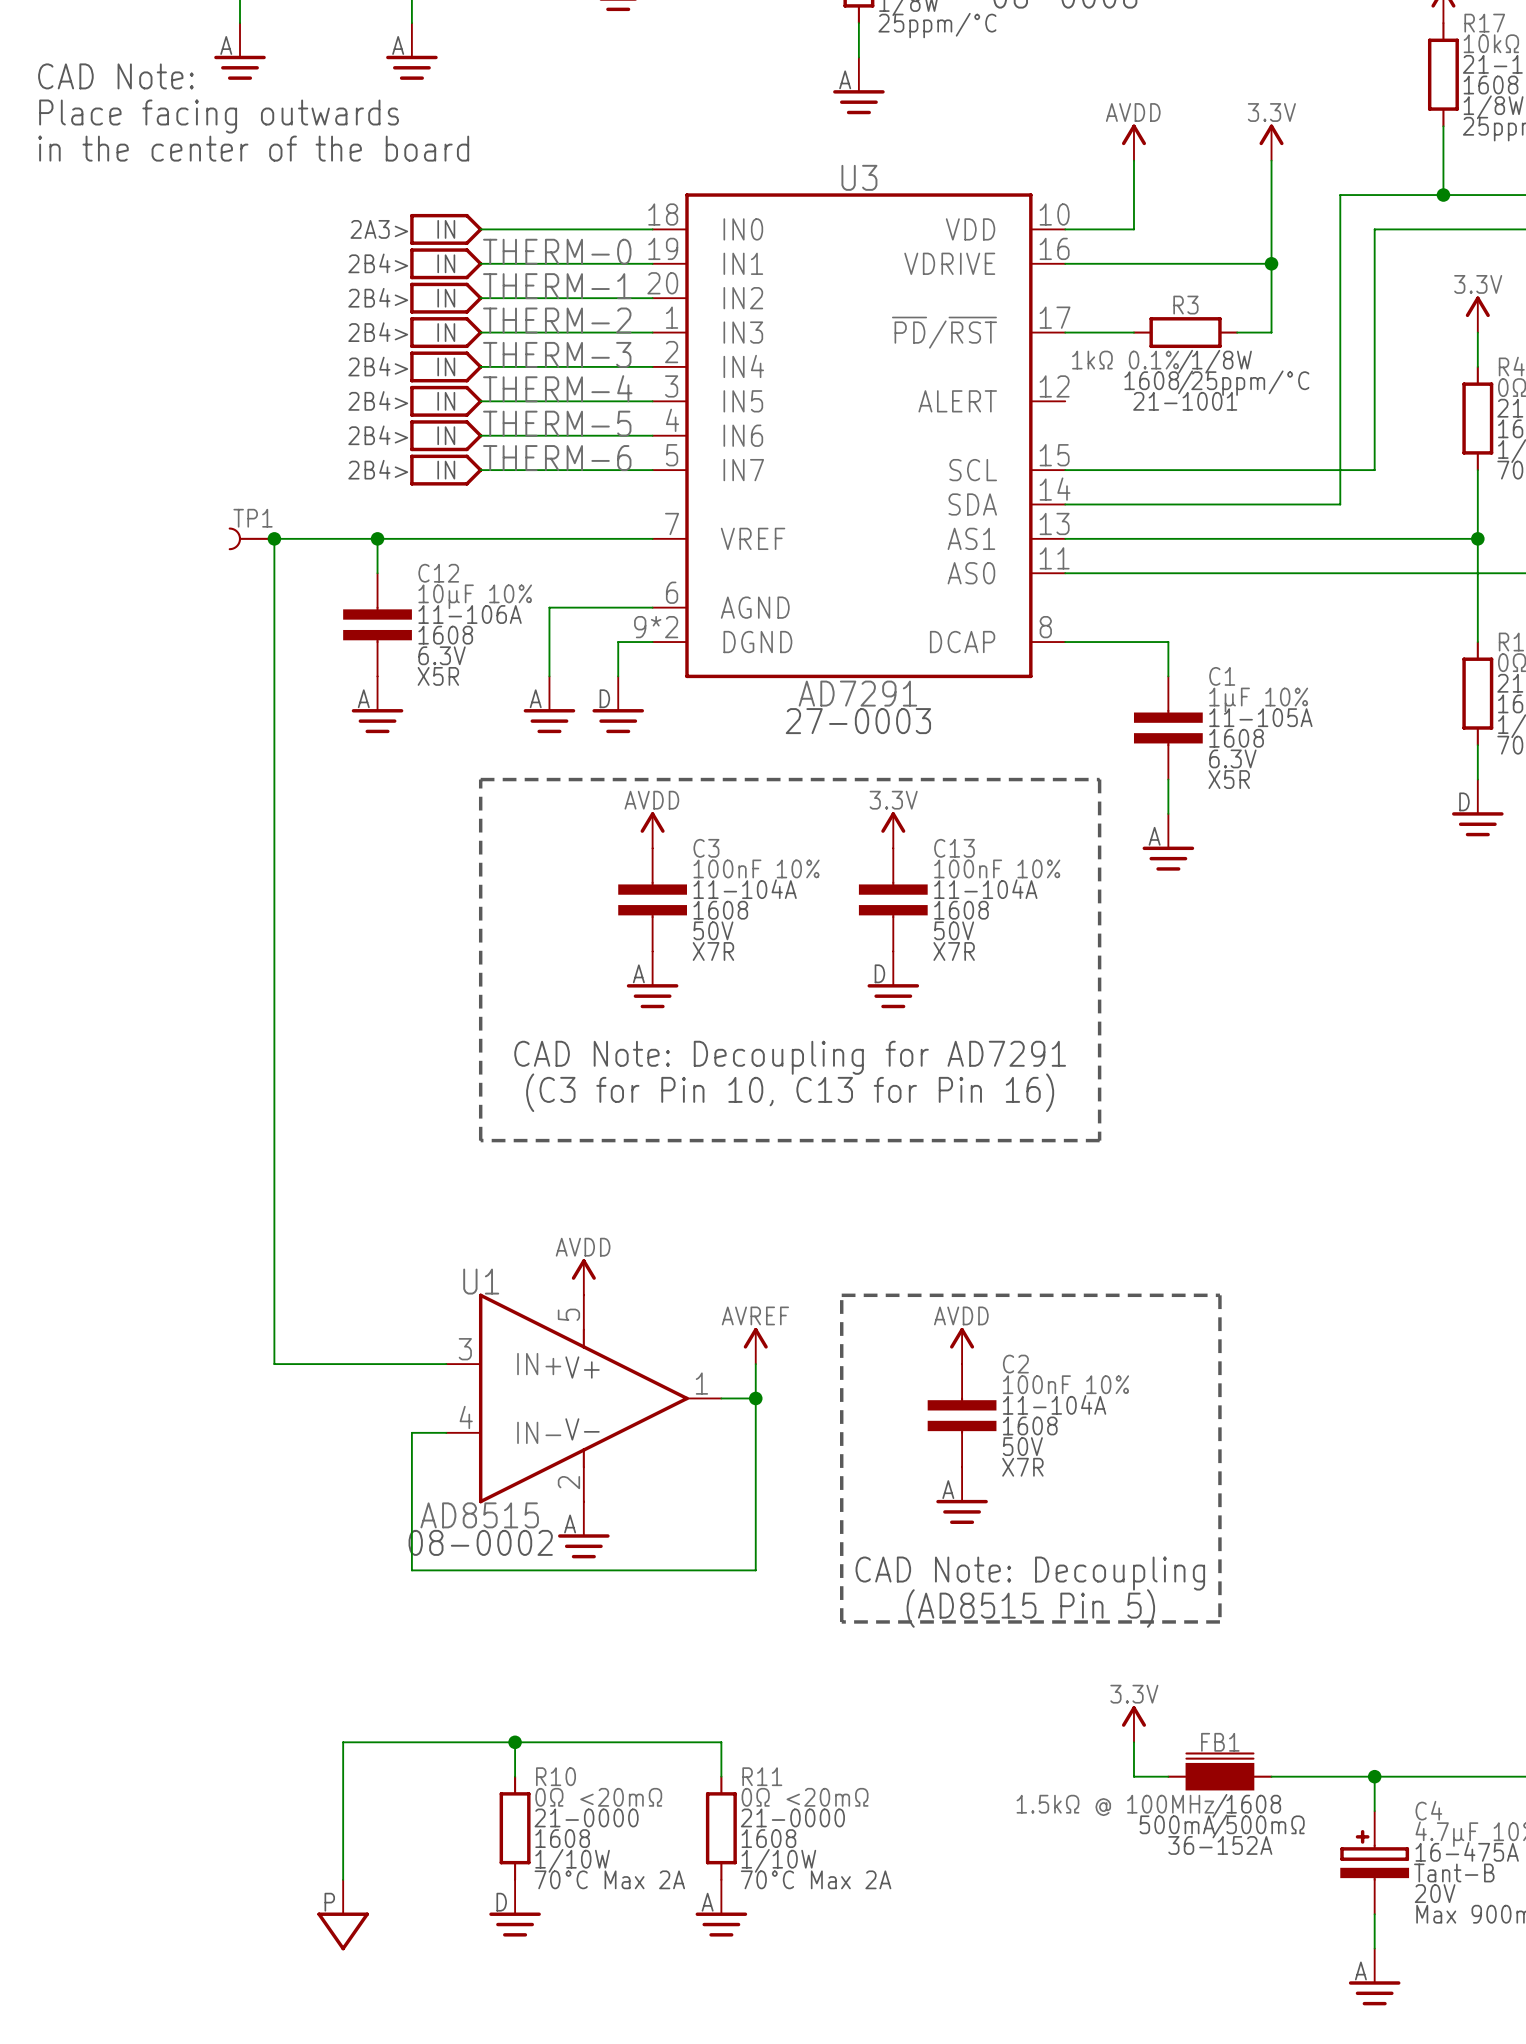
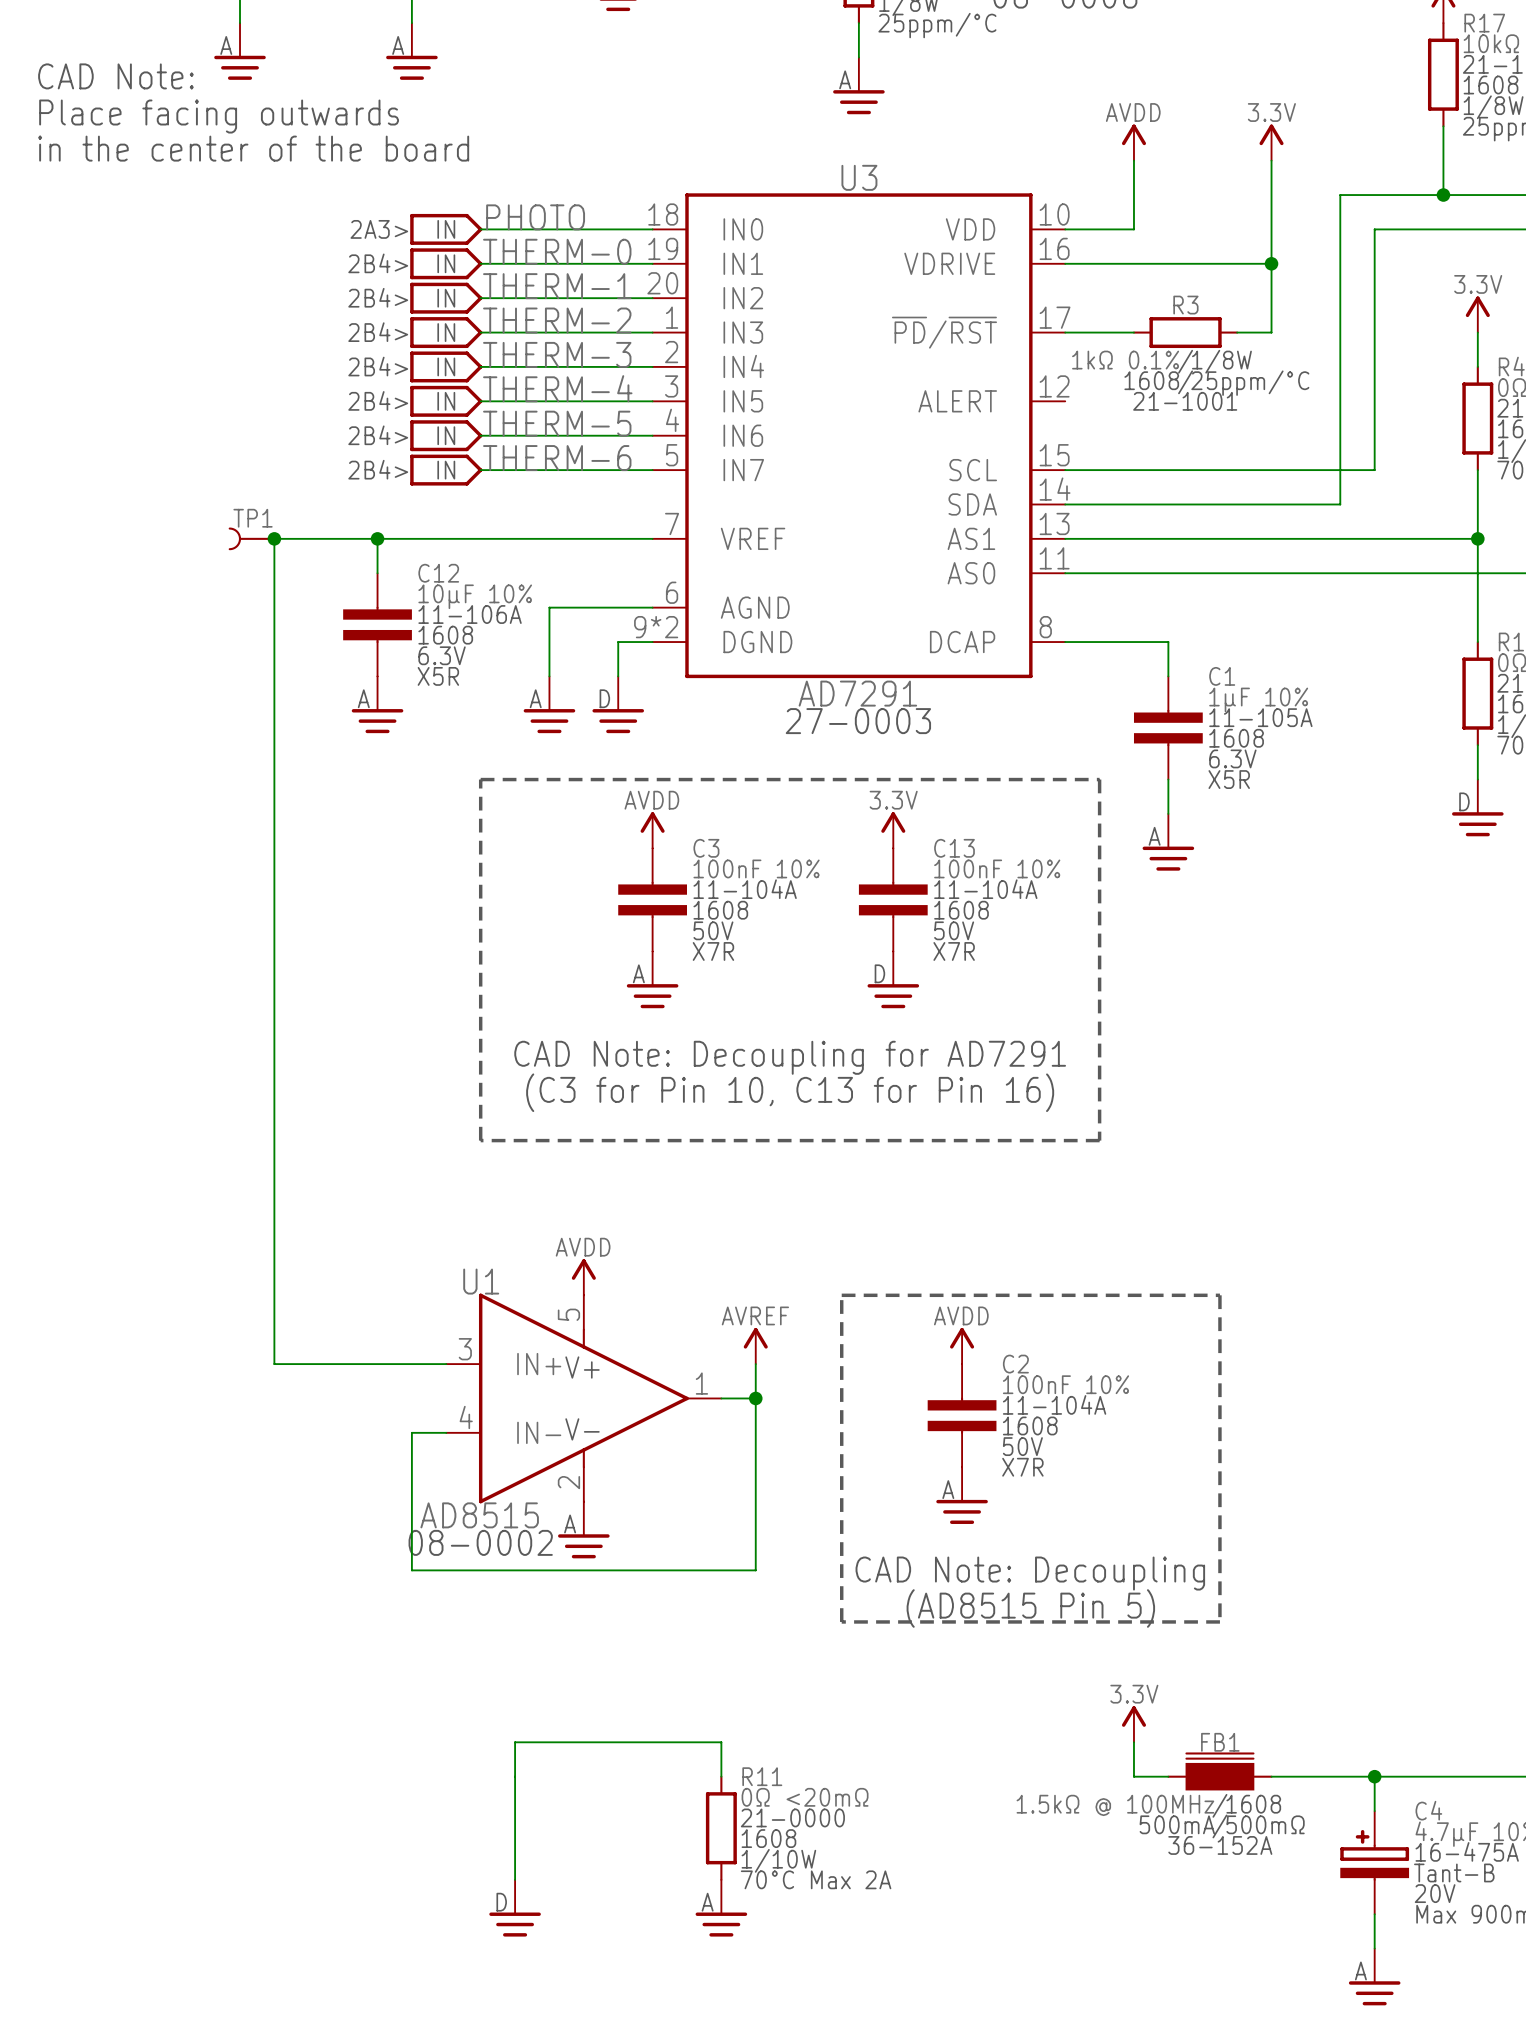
label: none -> PHOTO (535, 217)
wire: (515, 1742) (343, 1742) (343, 1879) -> none
junction: (515, 1742) -> none
wire: none -> (515, 1776) (515, 1879)
R10: 0Ω <20mΩ (515, 1828) -> none
power symbol: (343, 1915) -> none

